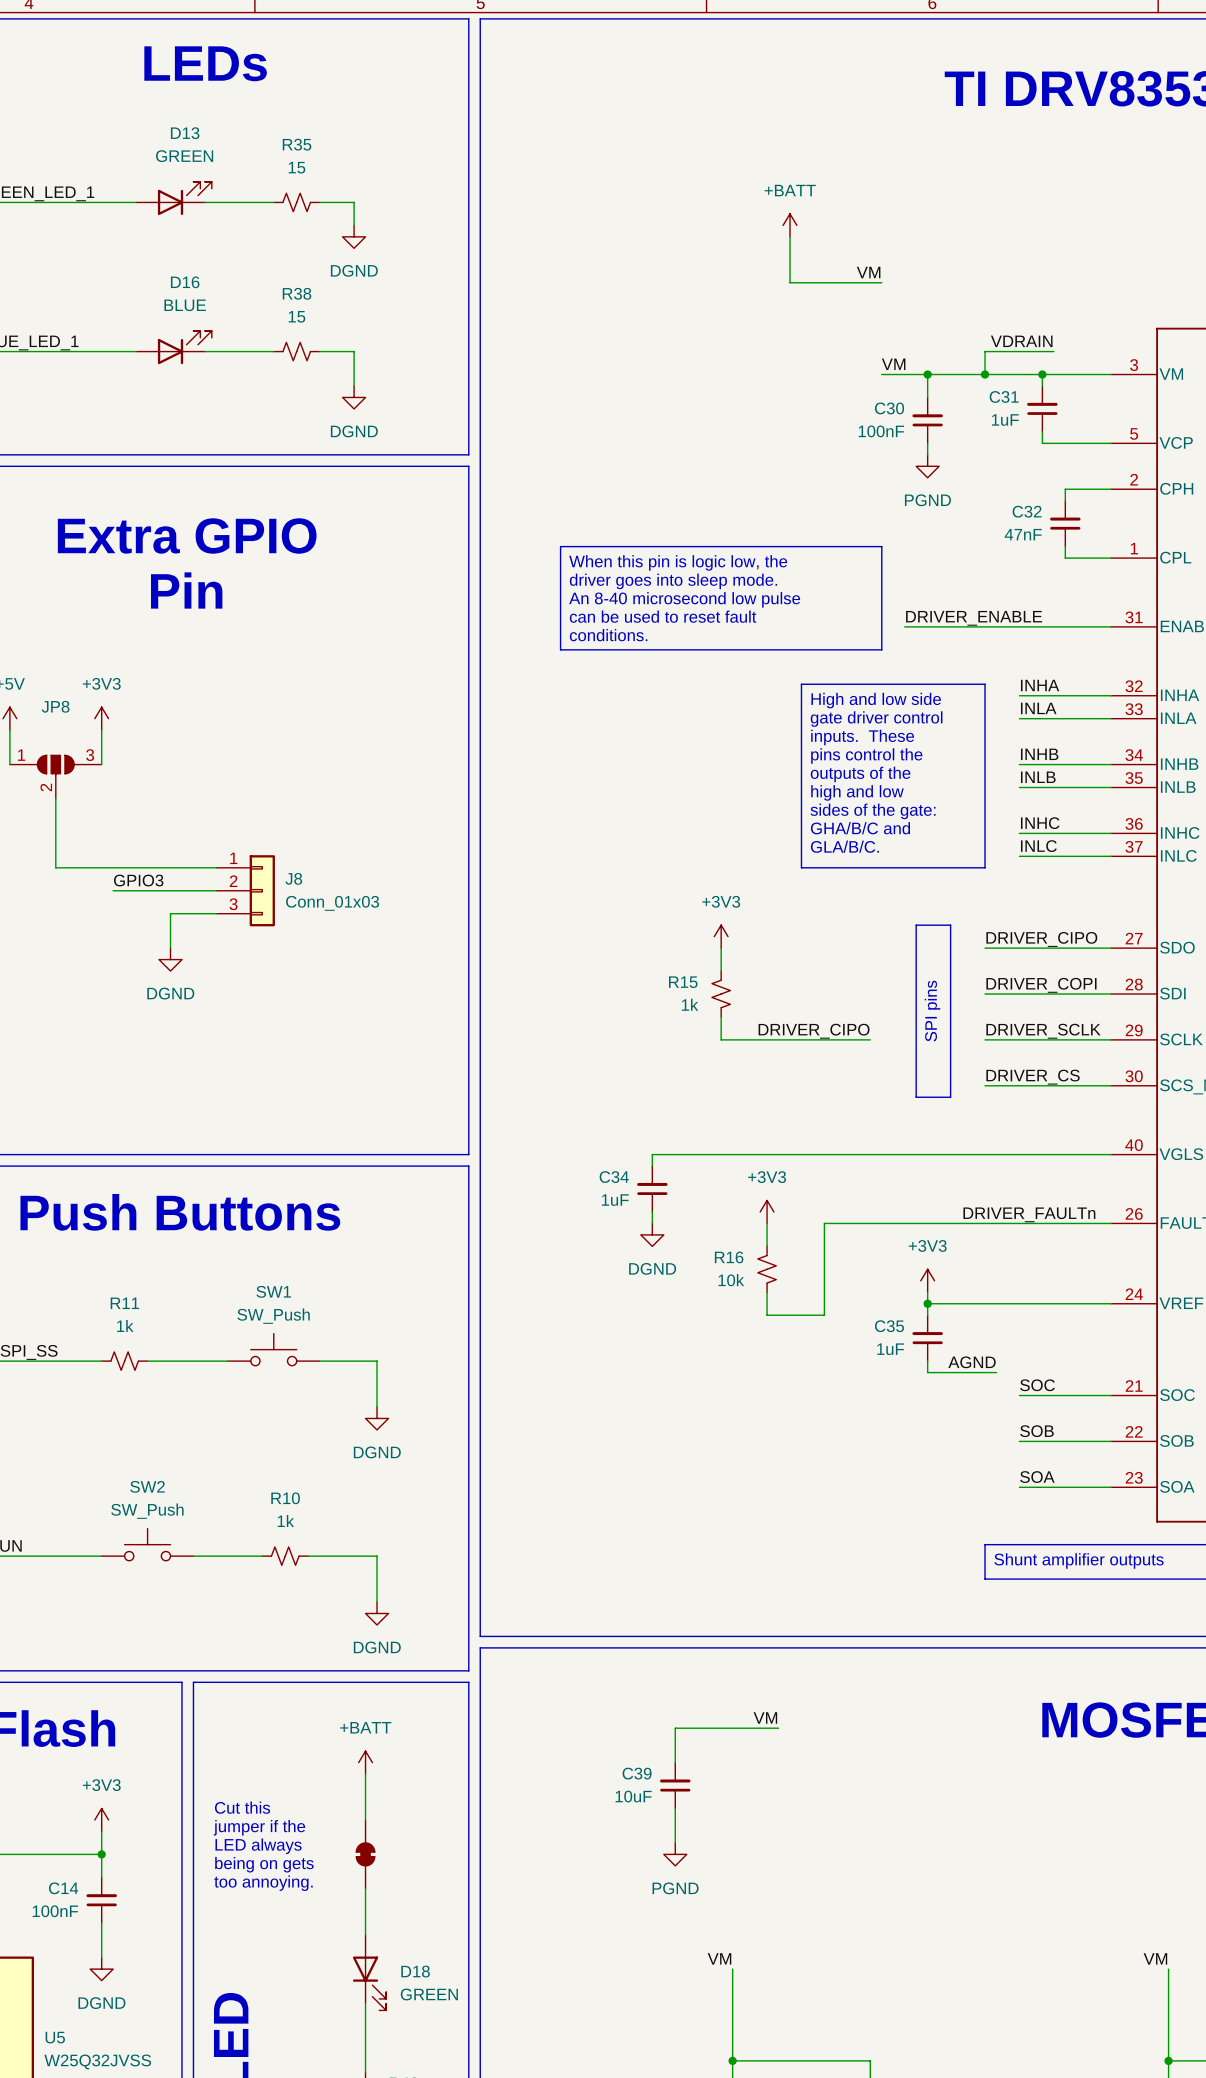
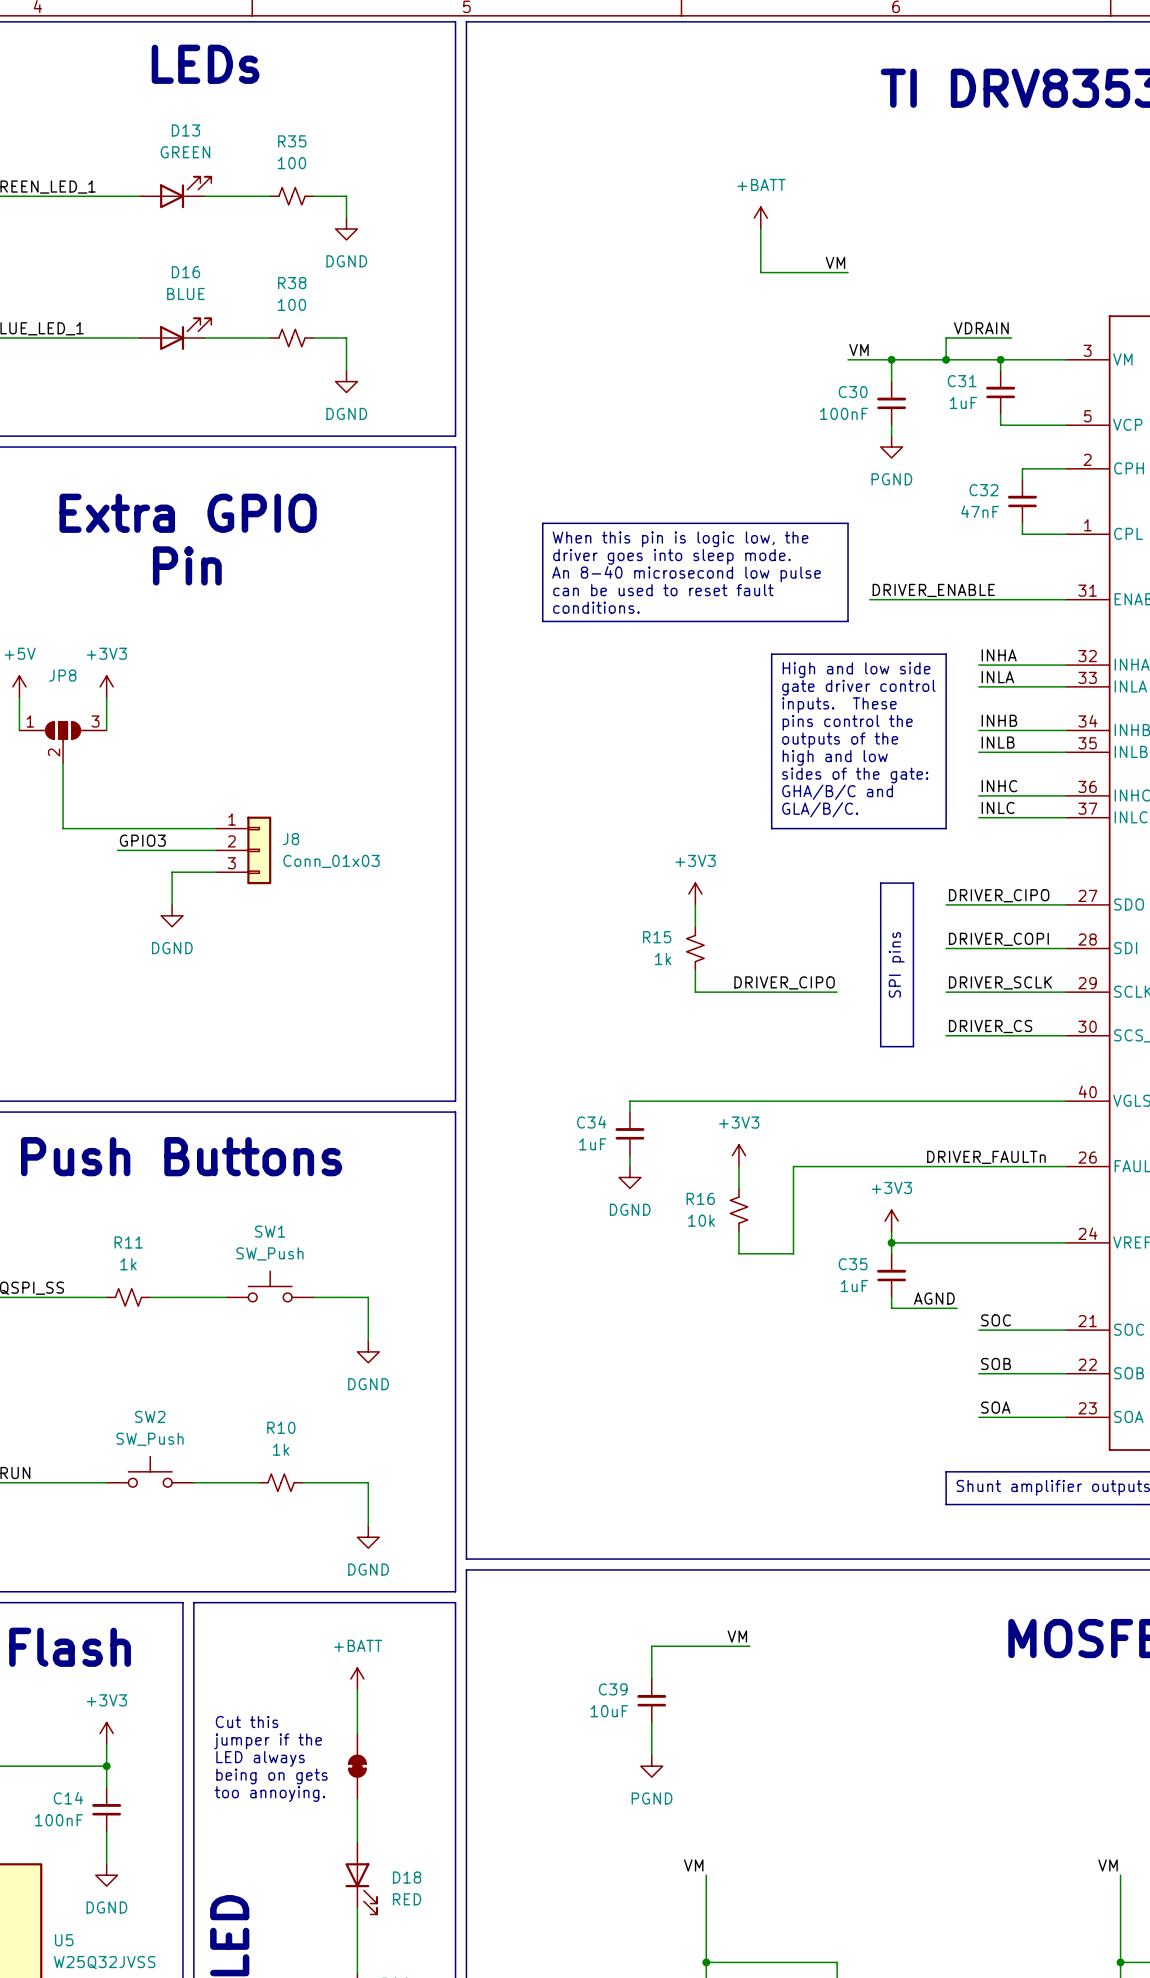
R35 value: 15 (296, 167) -> 100 (291, 163)
R38 value: 15 (296, 316) -> 100 (291, 304)
D18 value: GREEN (429, 1994) -> RED (407, 1899)

